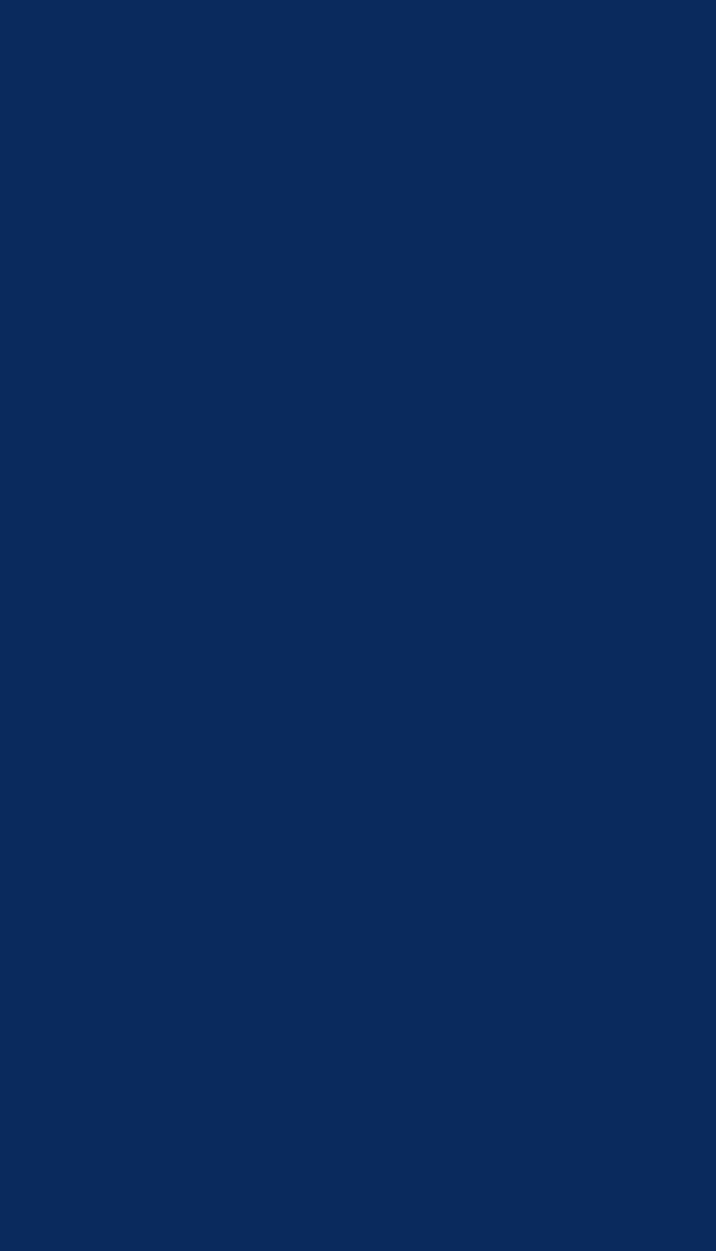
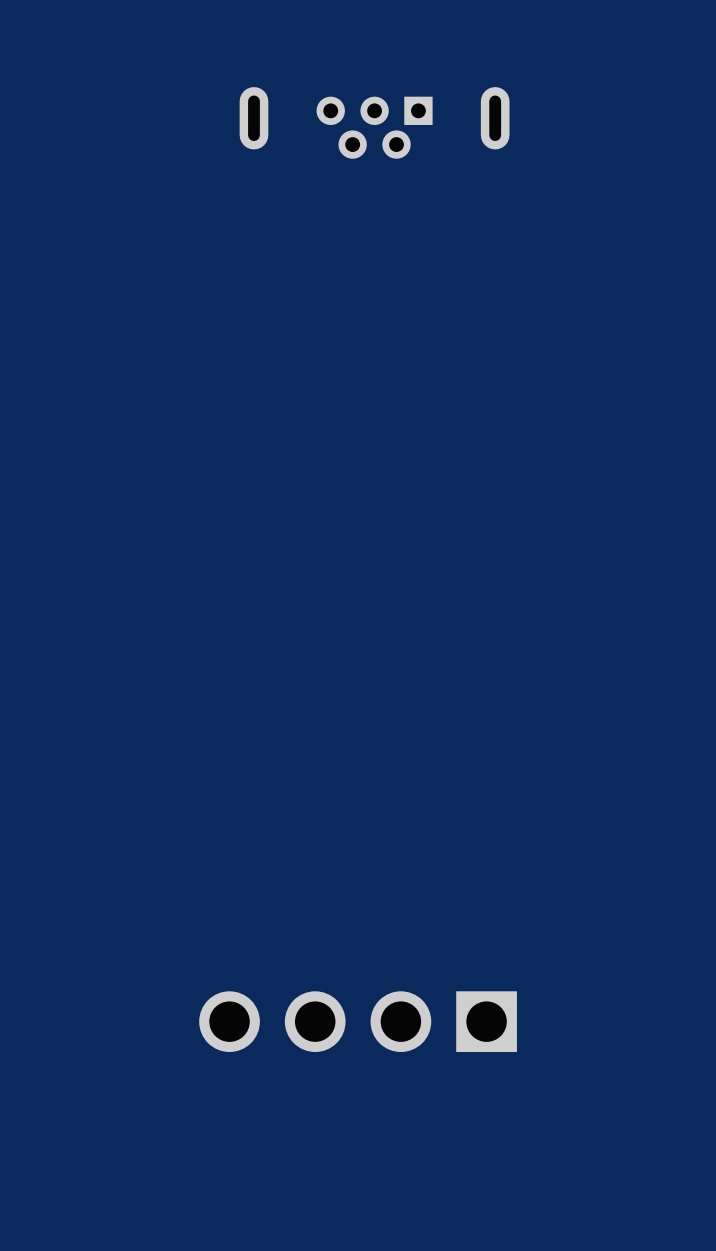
part: none -> (374, 122)
part: none -> (358, 1021)

